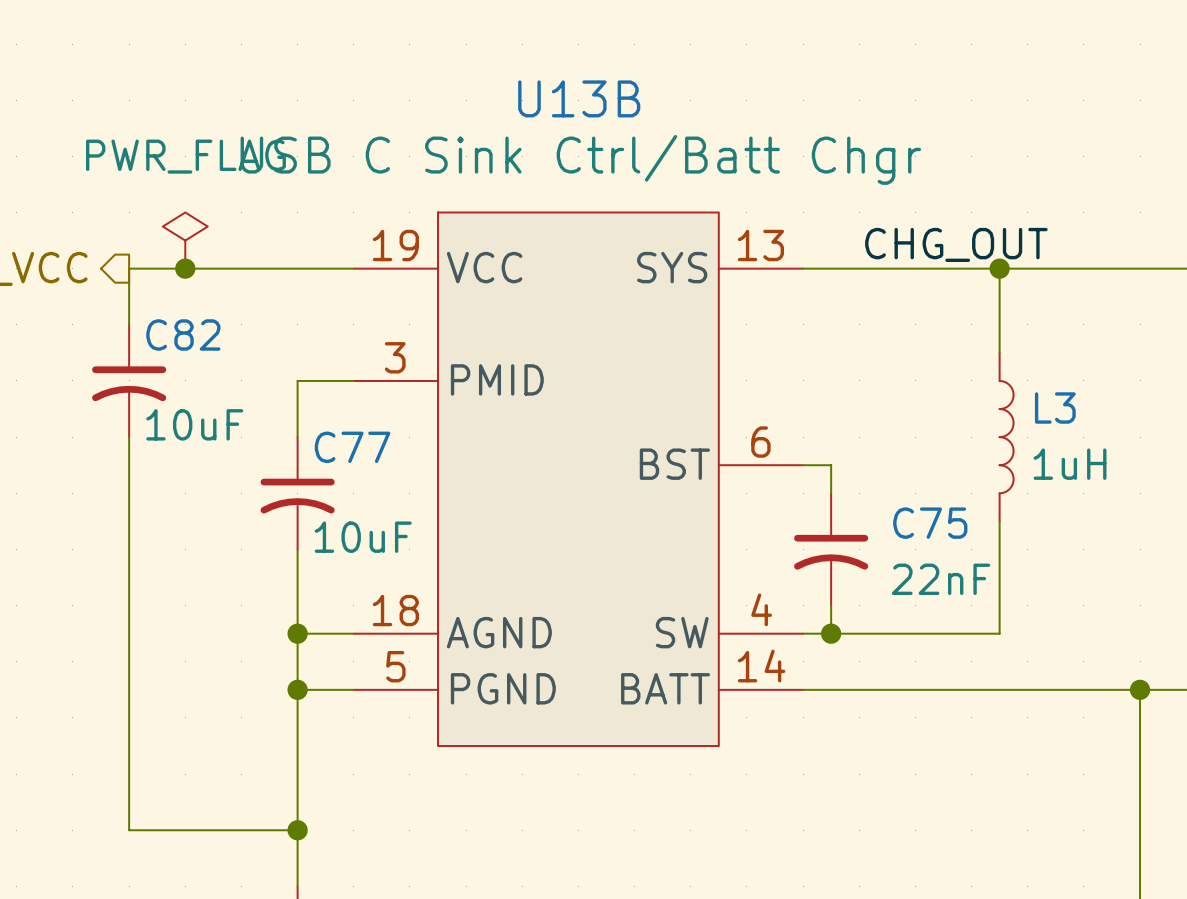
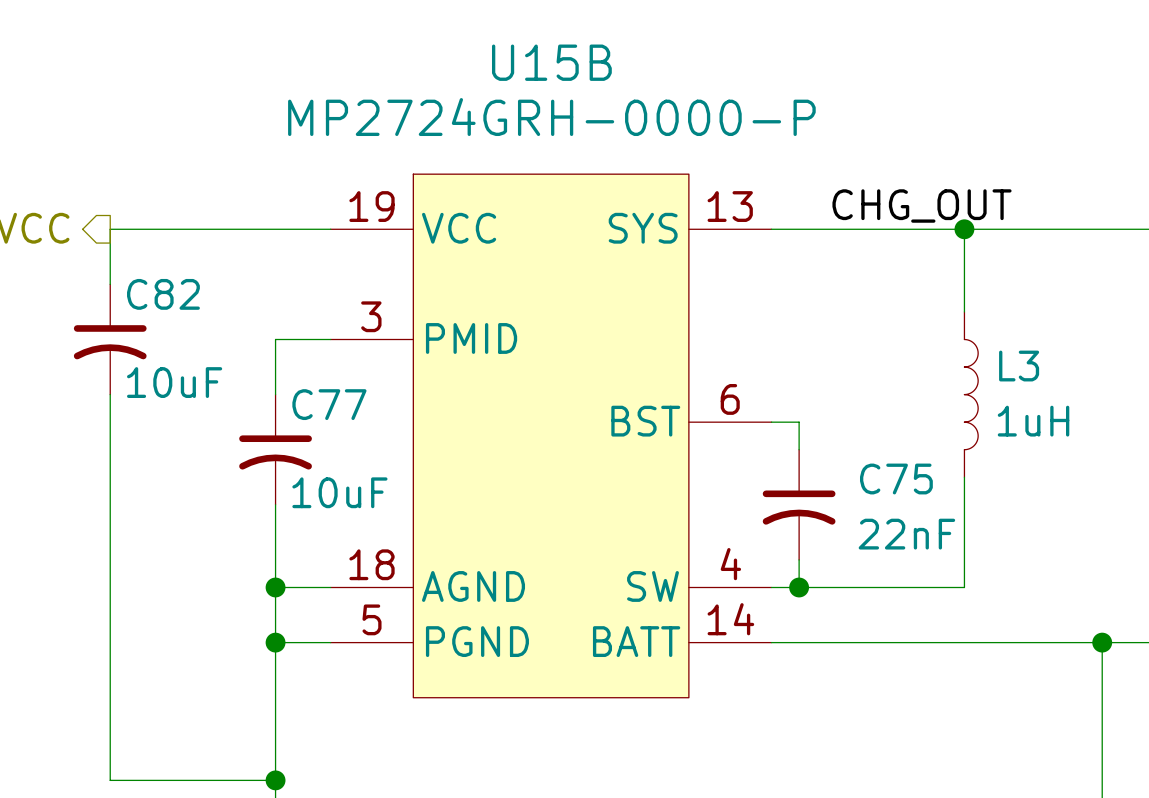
U13B name: U13B (579, 98) -> U15B (551, 62)
U13B value: USB C Sink Ctrl/Batt Chgr (580, 159) -> MP2724GRH-0000-P (551, 117)
power symbol: PWR_FLAG (185, 240) -> none
junction: (185, 268) -> none

